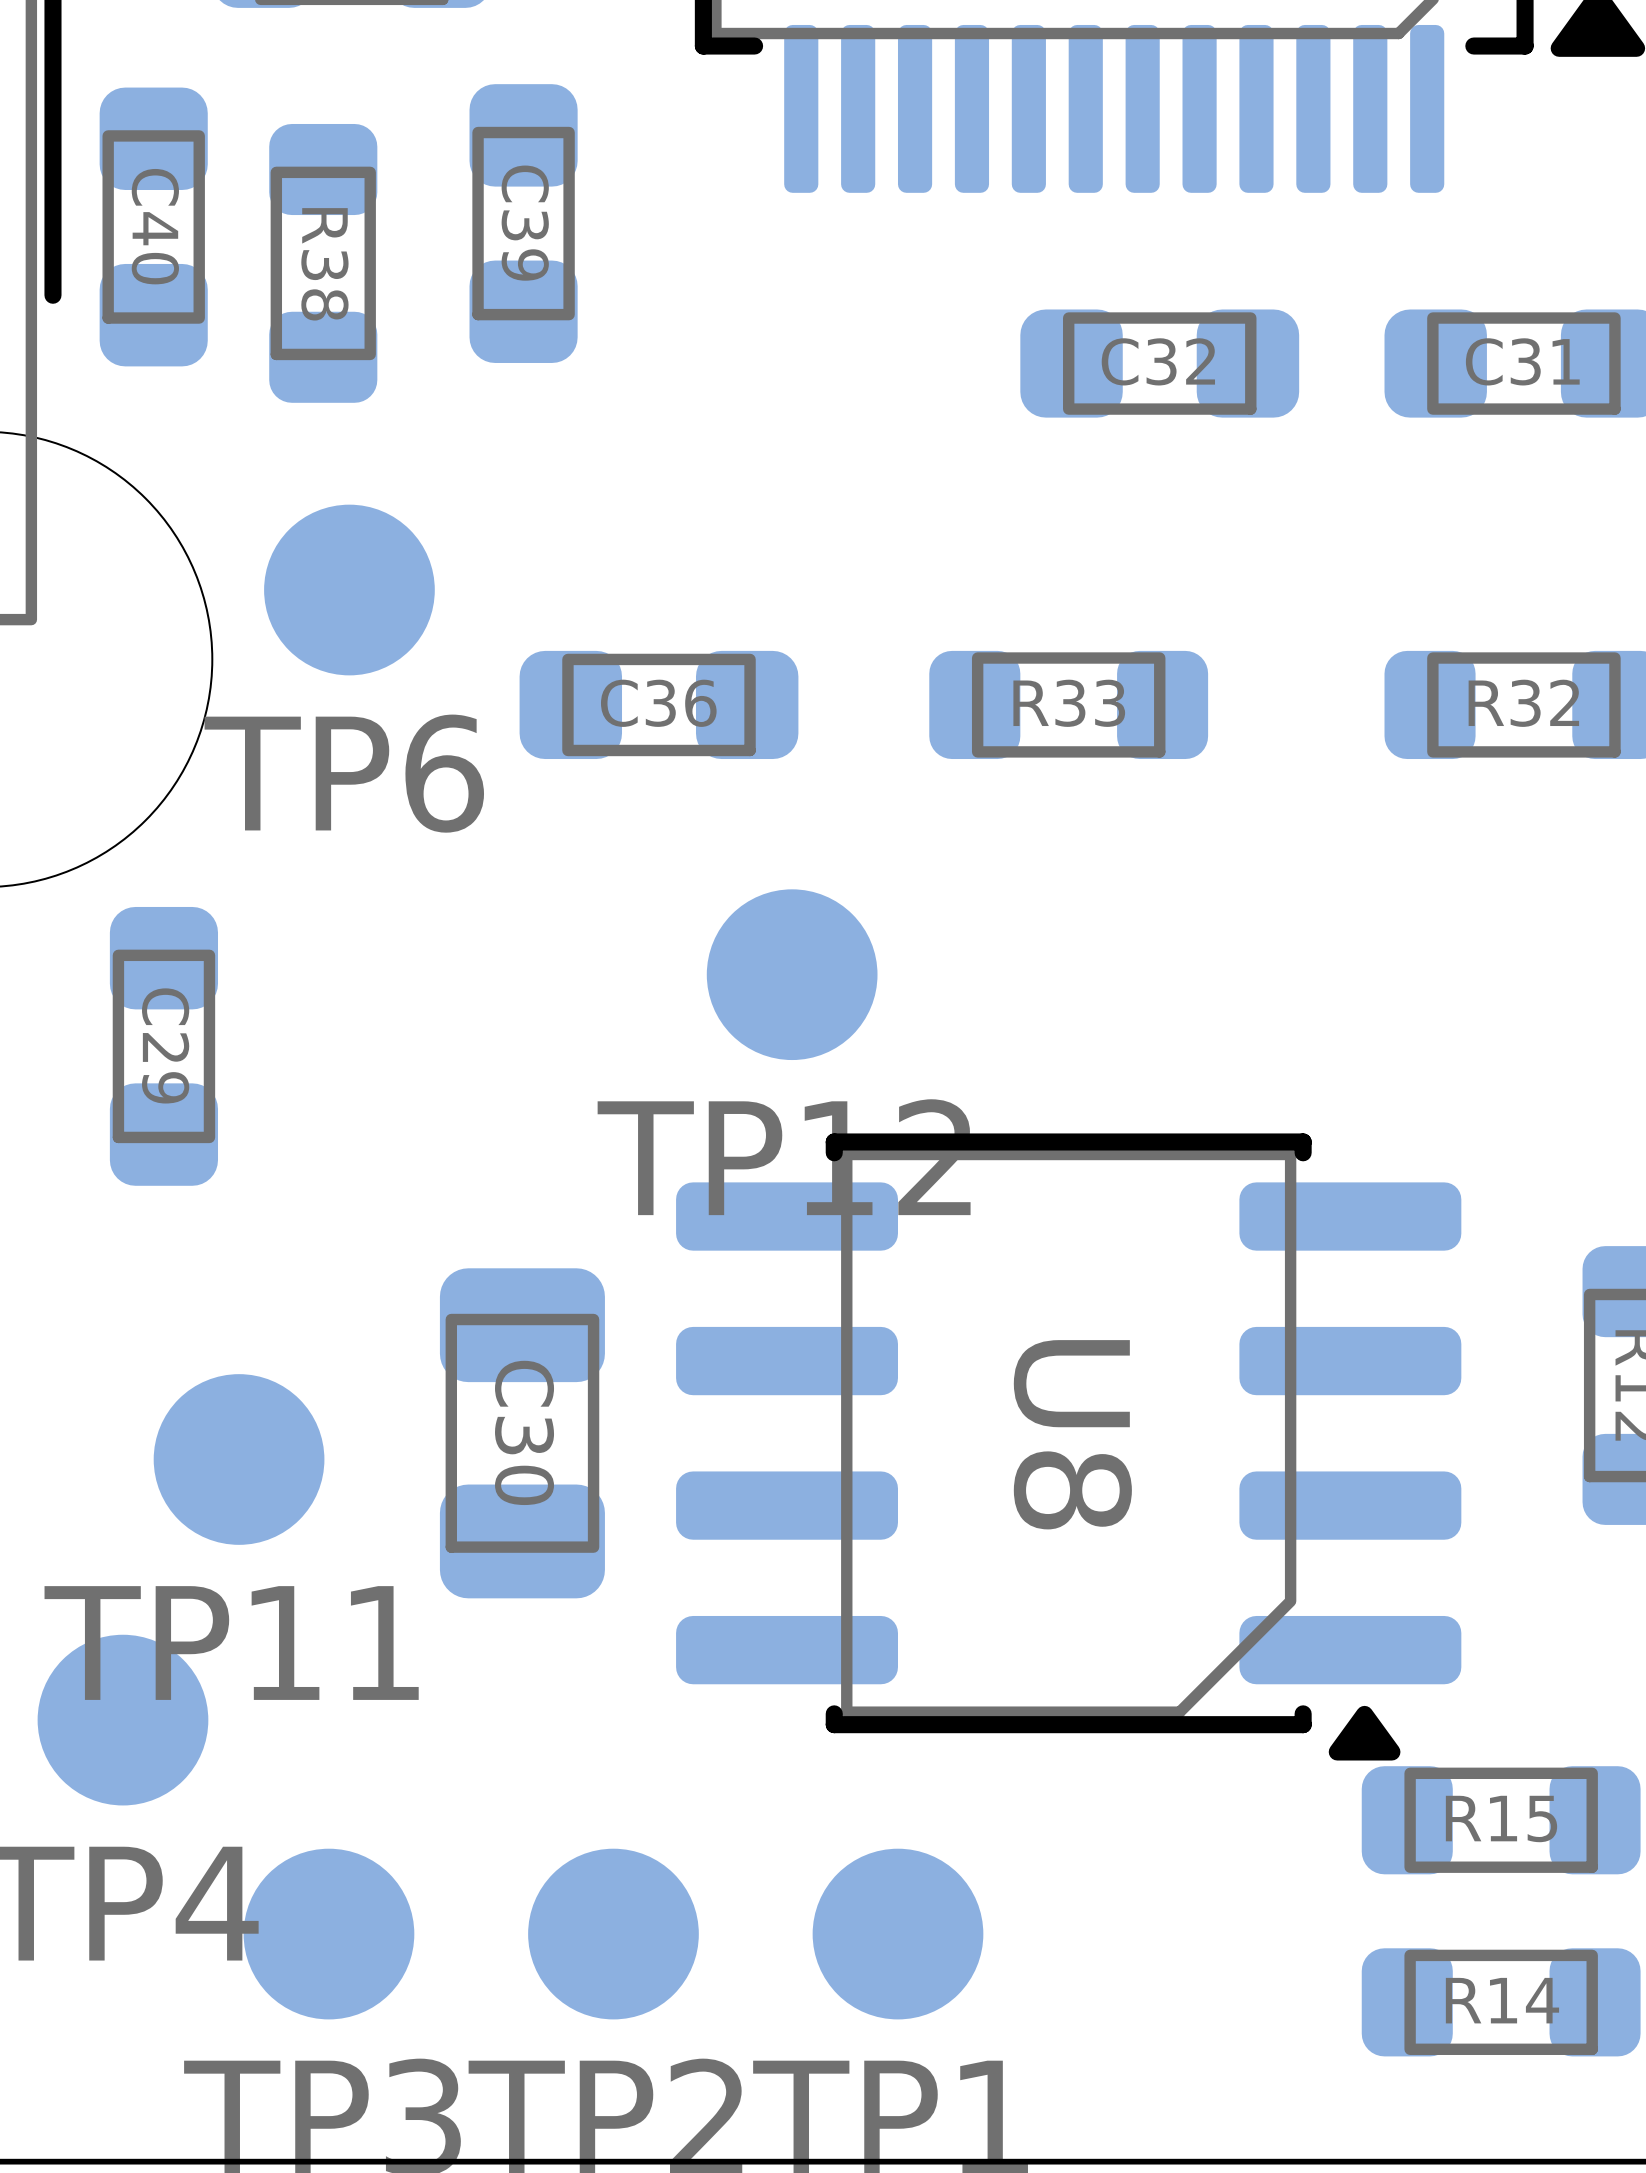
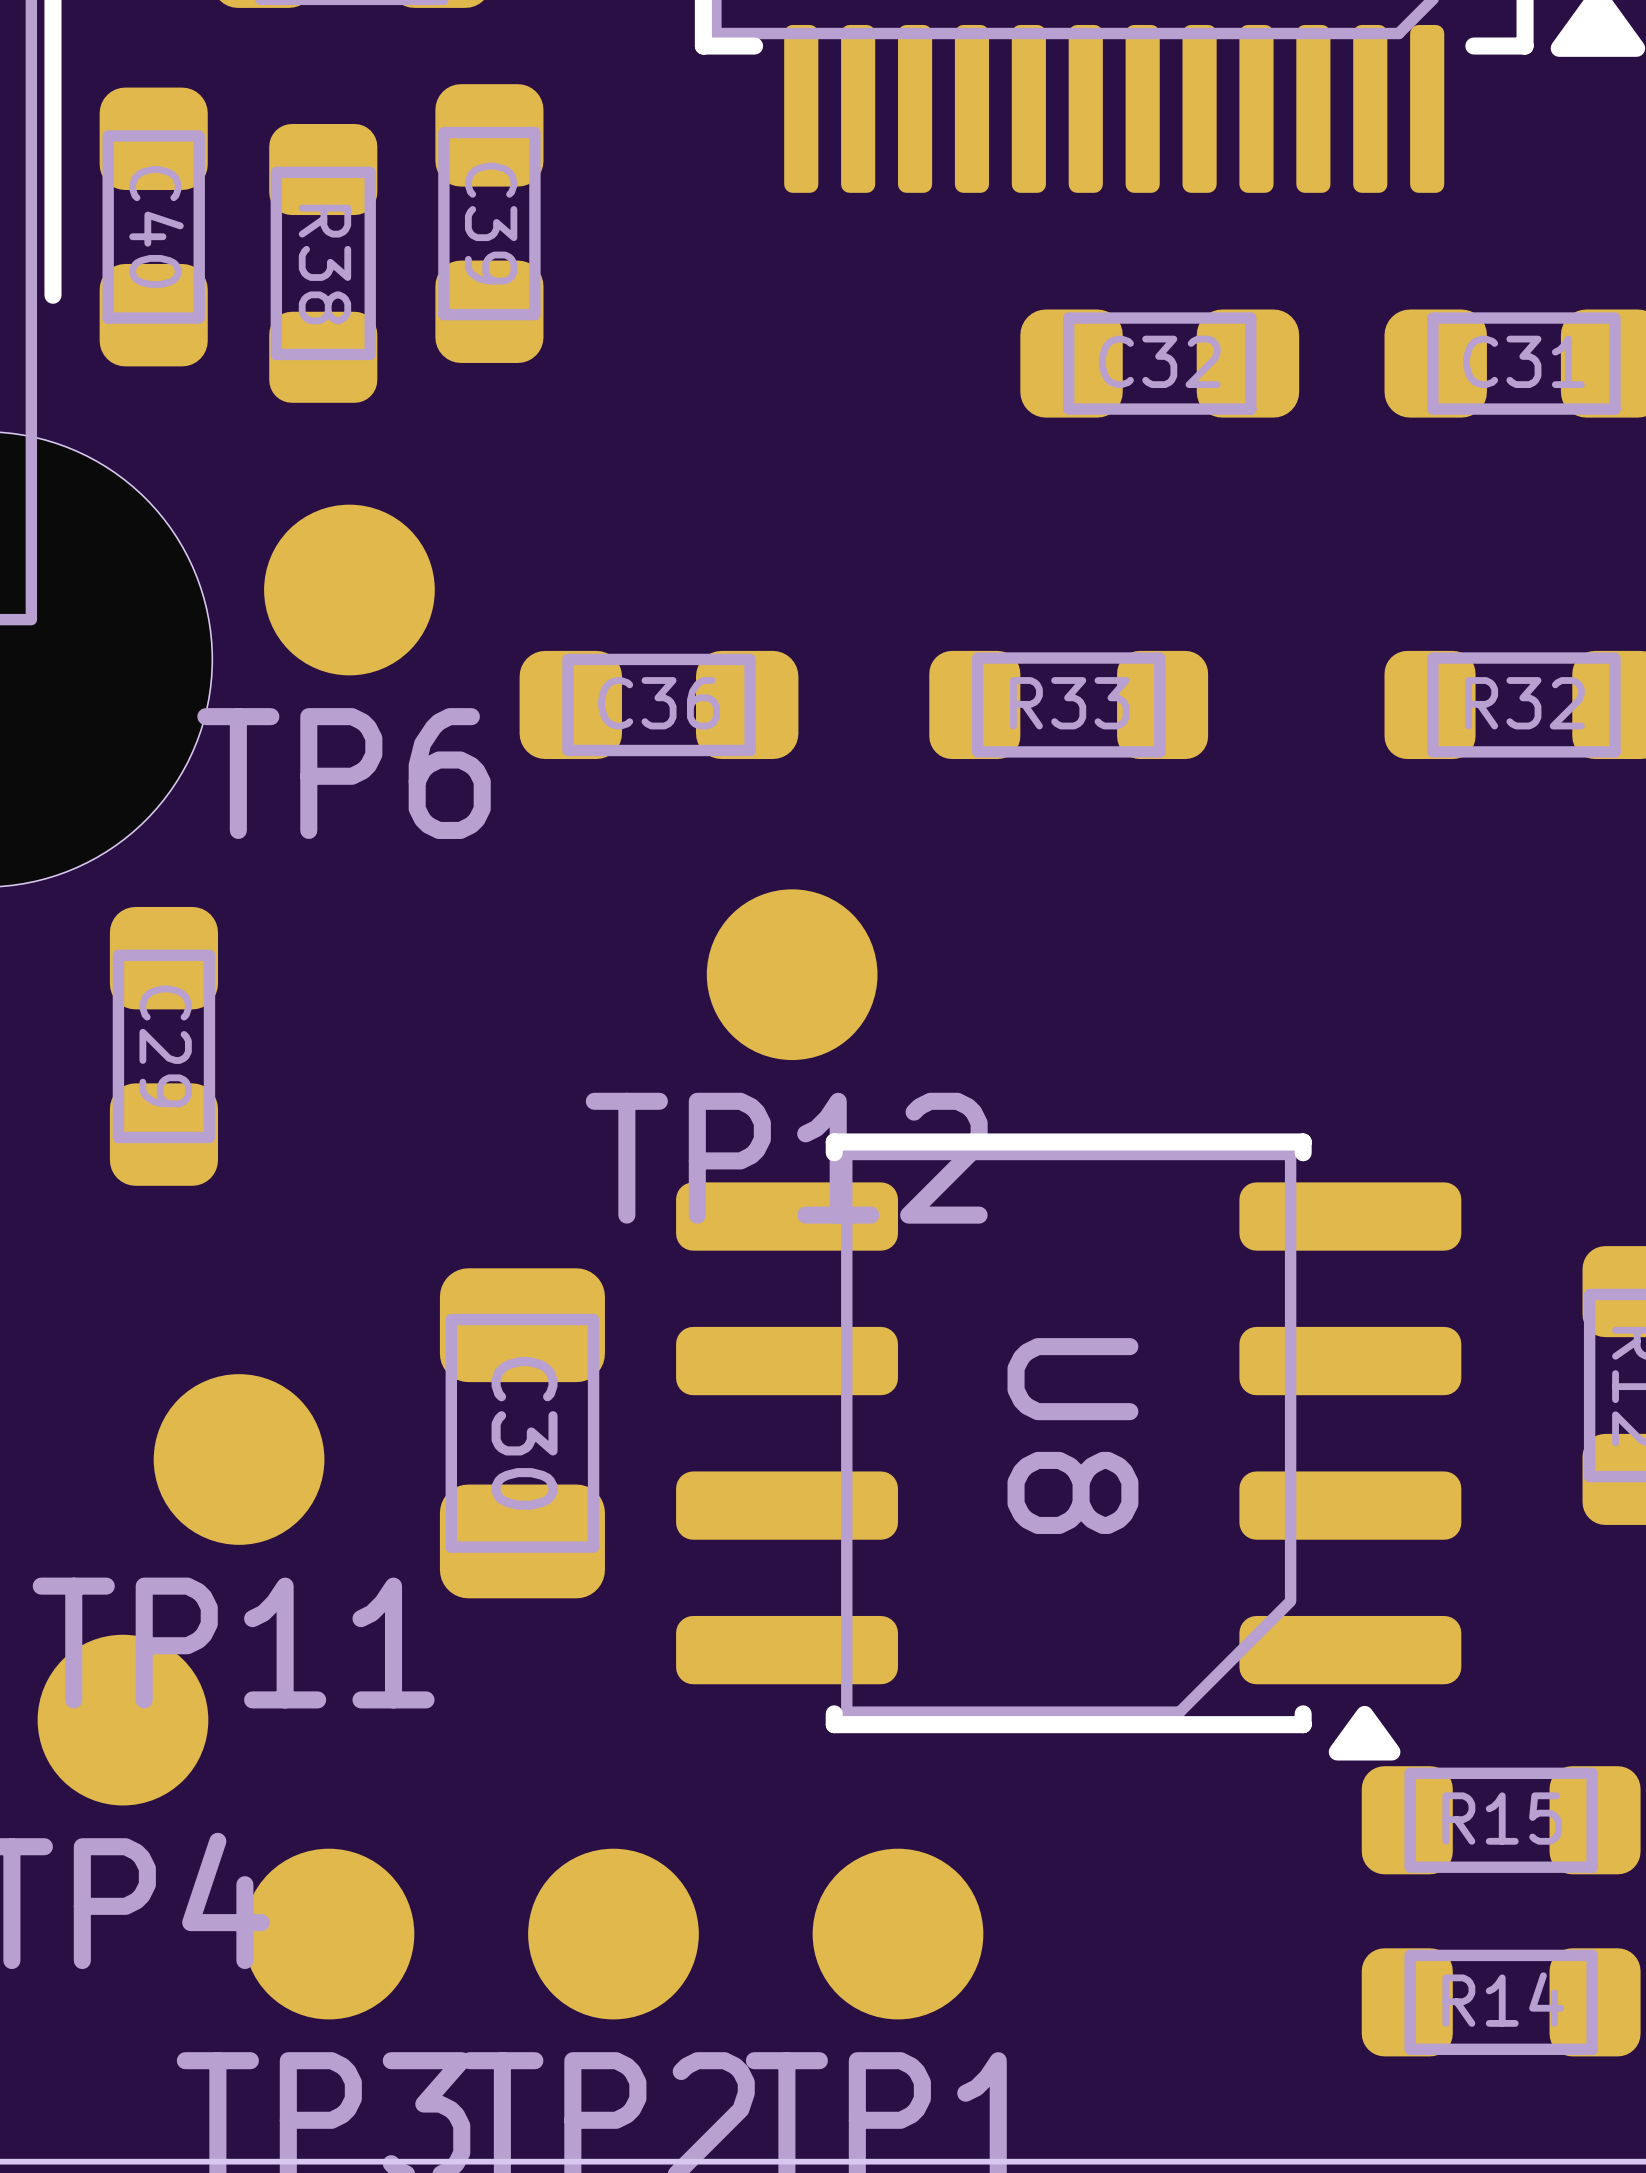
C39 position: (523, 223) -> (489, 223)

